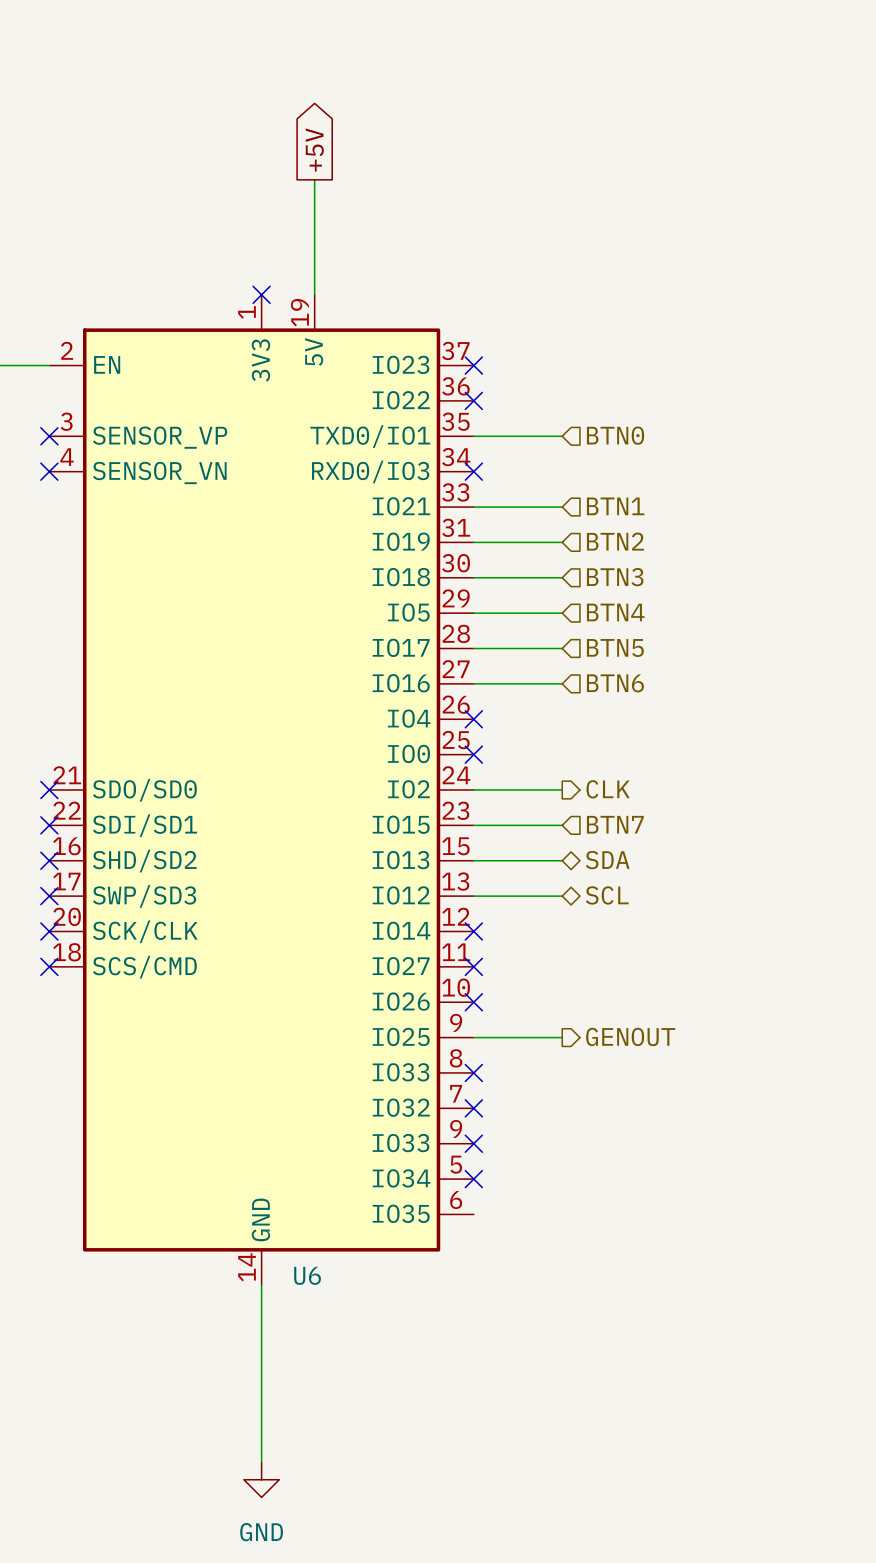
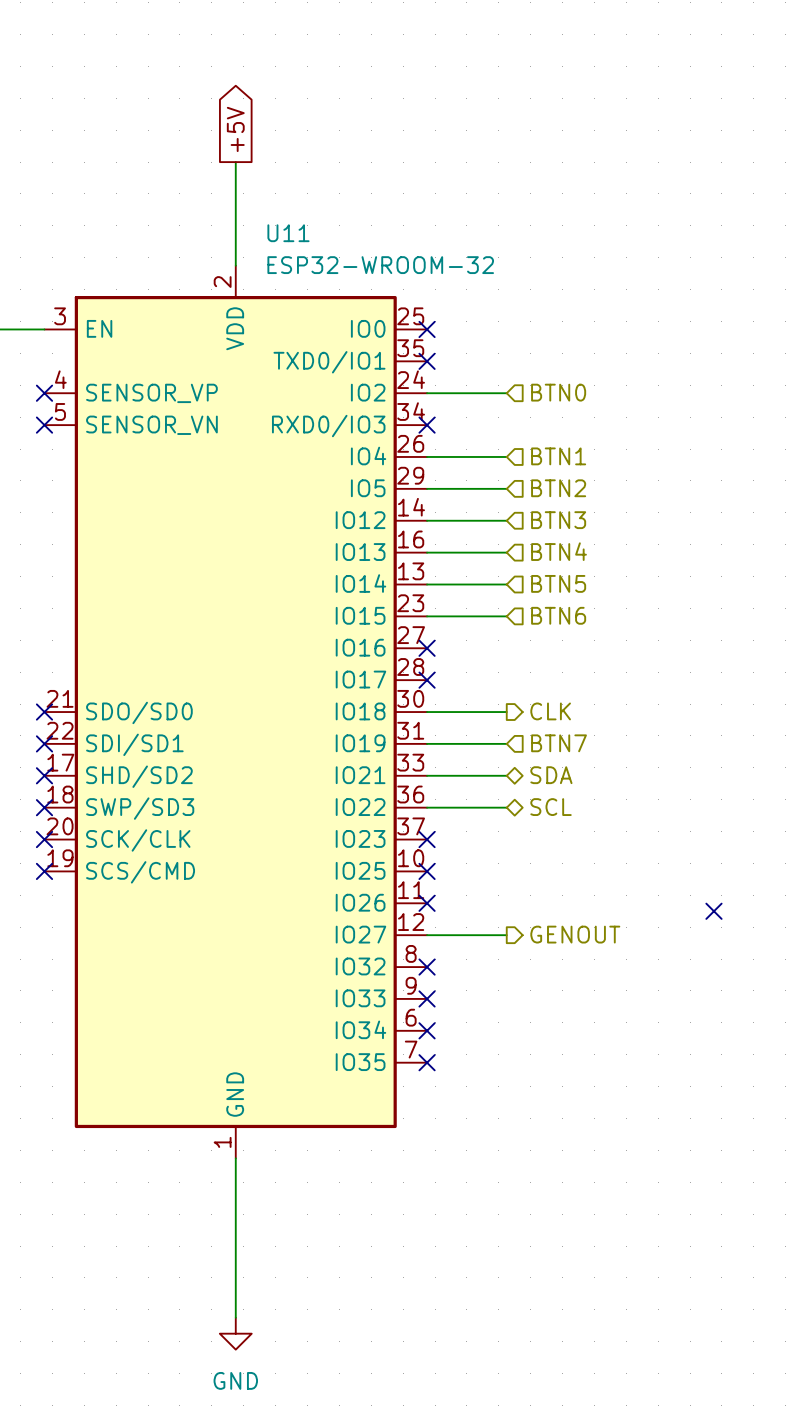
global label position: +5V (314, 150) -> +5V (235, 129)
wire: (314, 179) (314, 294) -> (235, 162) (235, 265)
no-connect mark: (261, 294) -> none
U6: (261, 790) -> none
U11: none -> ESP32-WROOM-32 (235, 712)
no-connect mark: none -> (713, 911)

